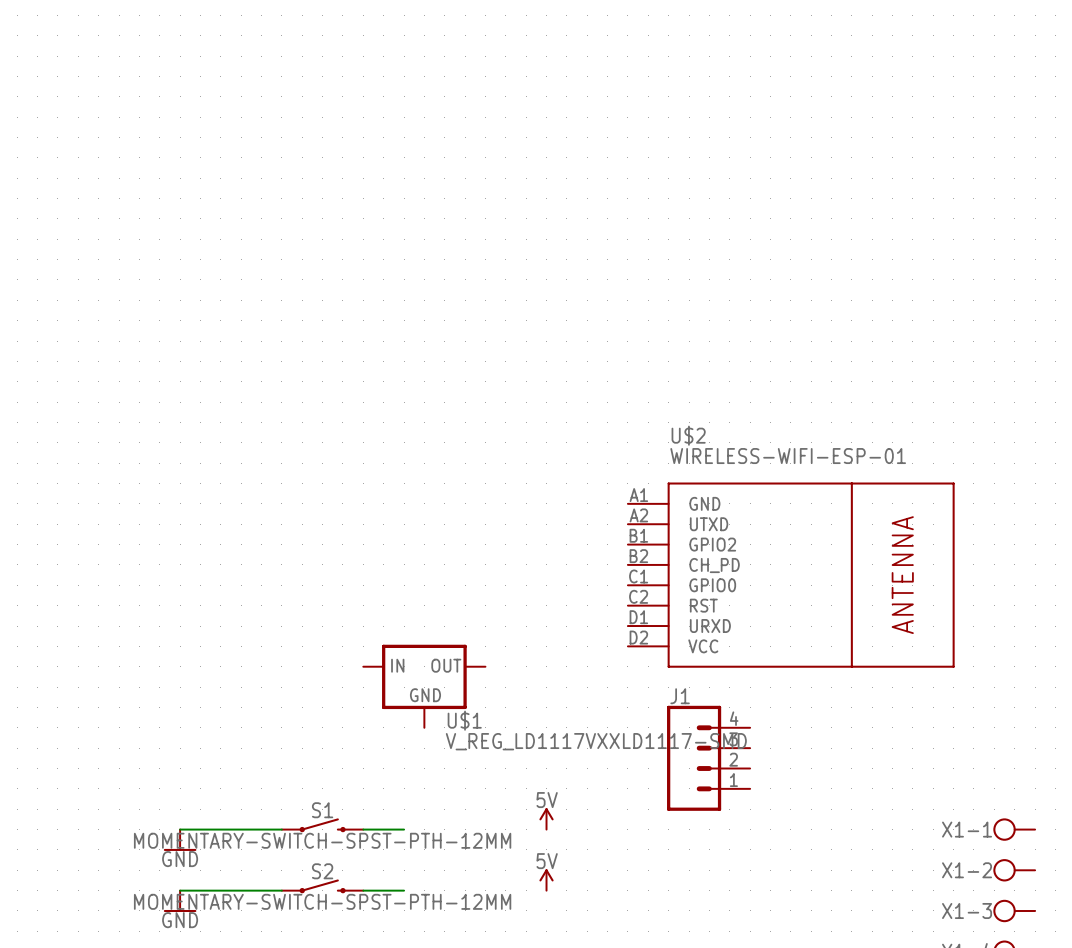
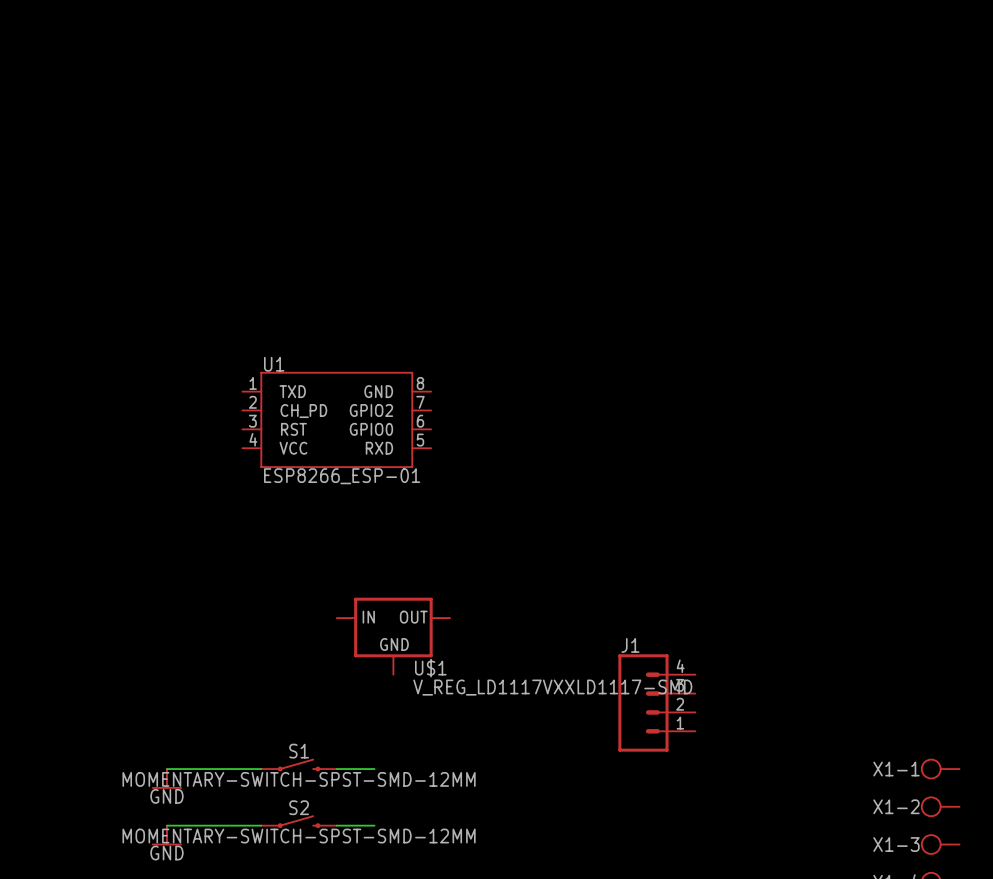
U1: none -> ESP8266_ESP-01 (336, 419)
U$2: WIRELESS-WIFI-ESP-01 (791, 575) -> none
power symbol: 5V (546, 818) -> none
S1 value: MOMENTARY-SWITCH-SPST-PTH-12MM (322, 840) -> MOMENTARY-SWITCH-SPST-SMD-12MM (299, 779)
power symbol: 5V (546, 879) -> none
S2 value: MOMENTARY-SWITCH-SPST-PTH-12MM (322, 901) -> MOMENTARY-SWITCH-SPST-SMD-12MM (299, 836)

